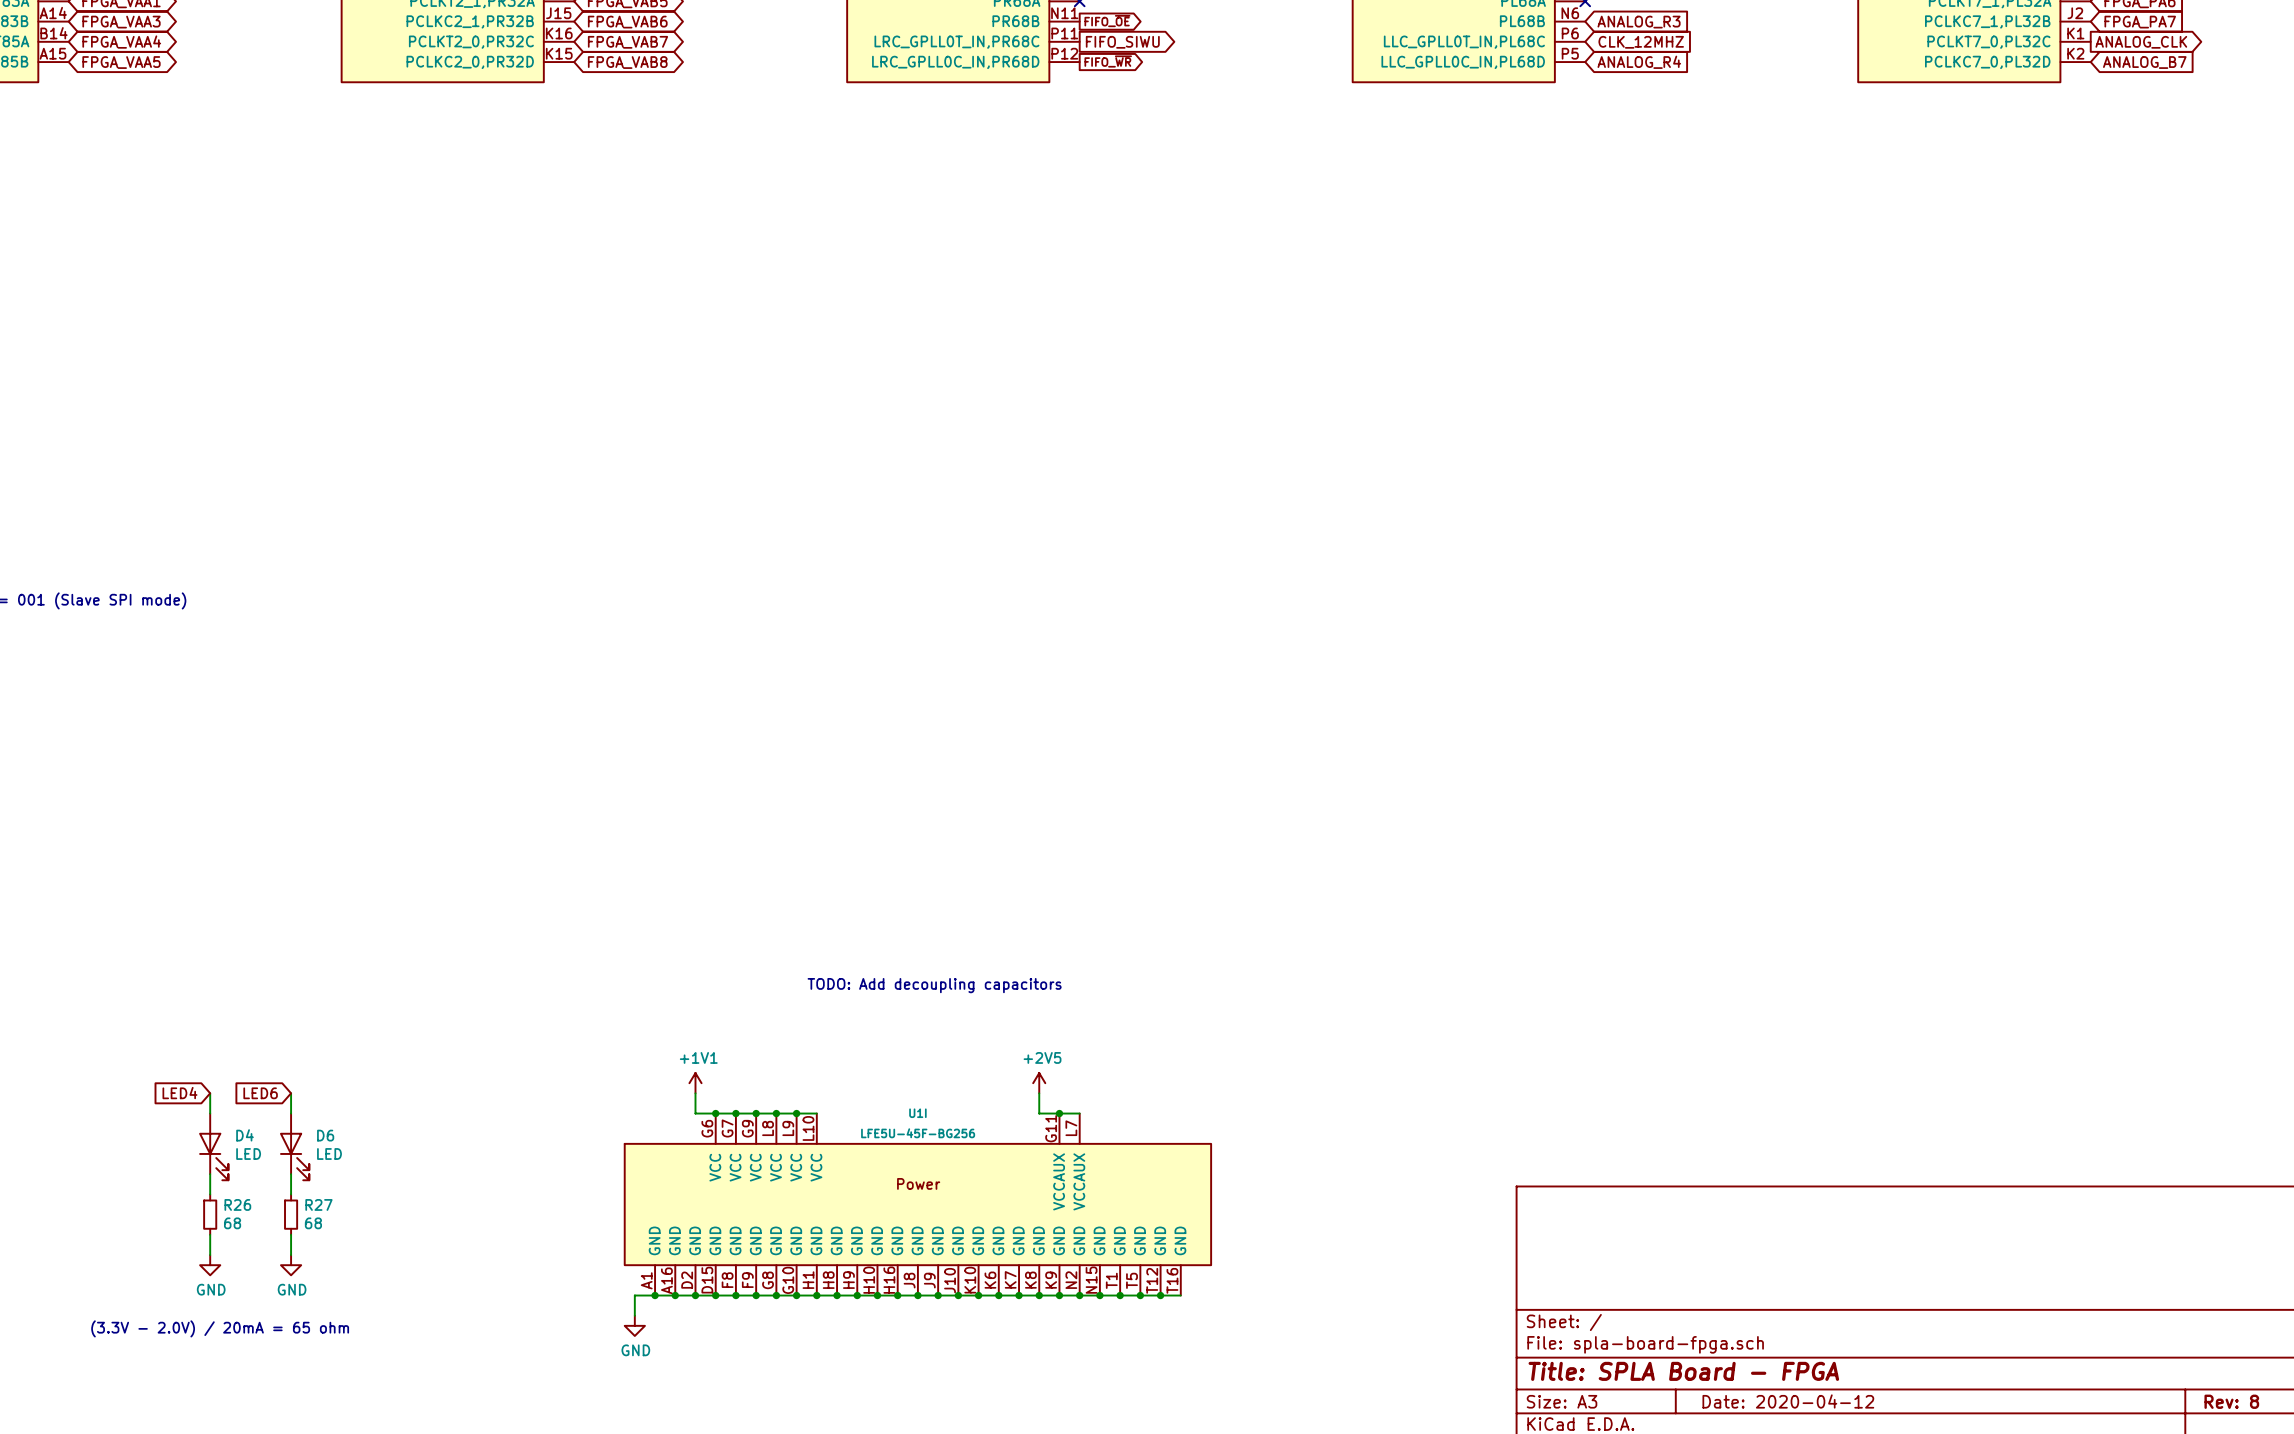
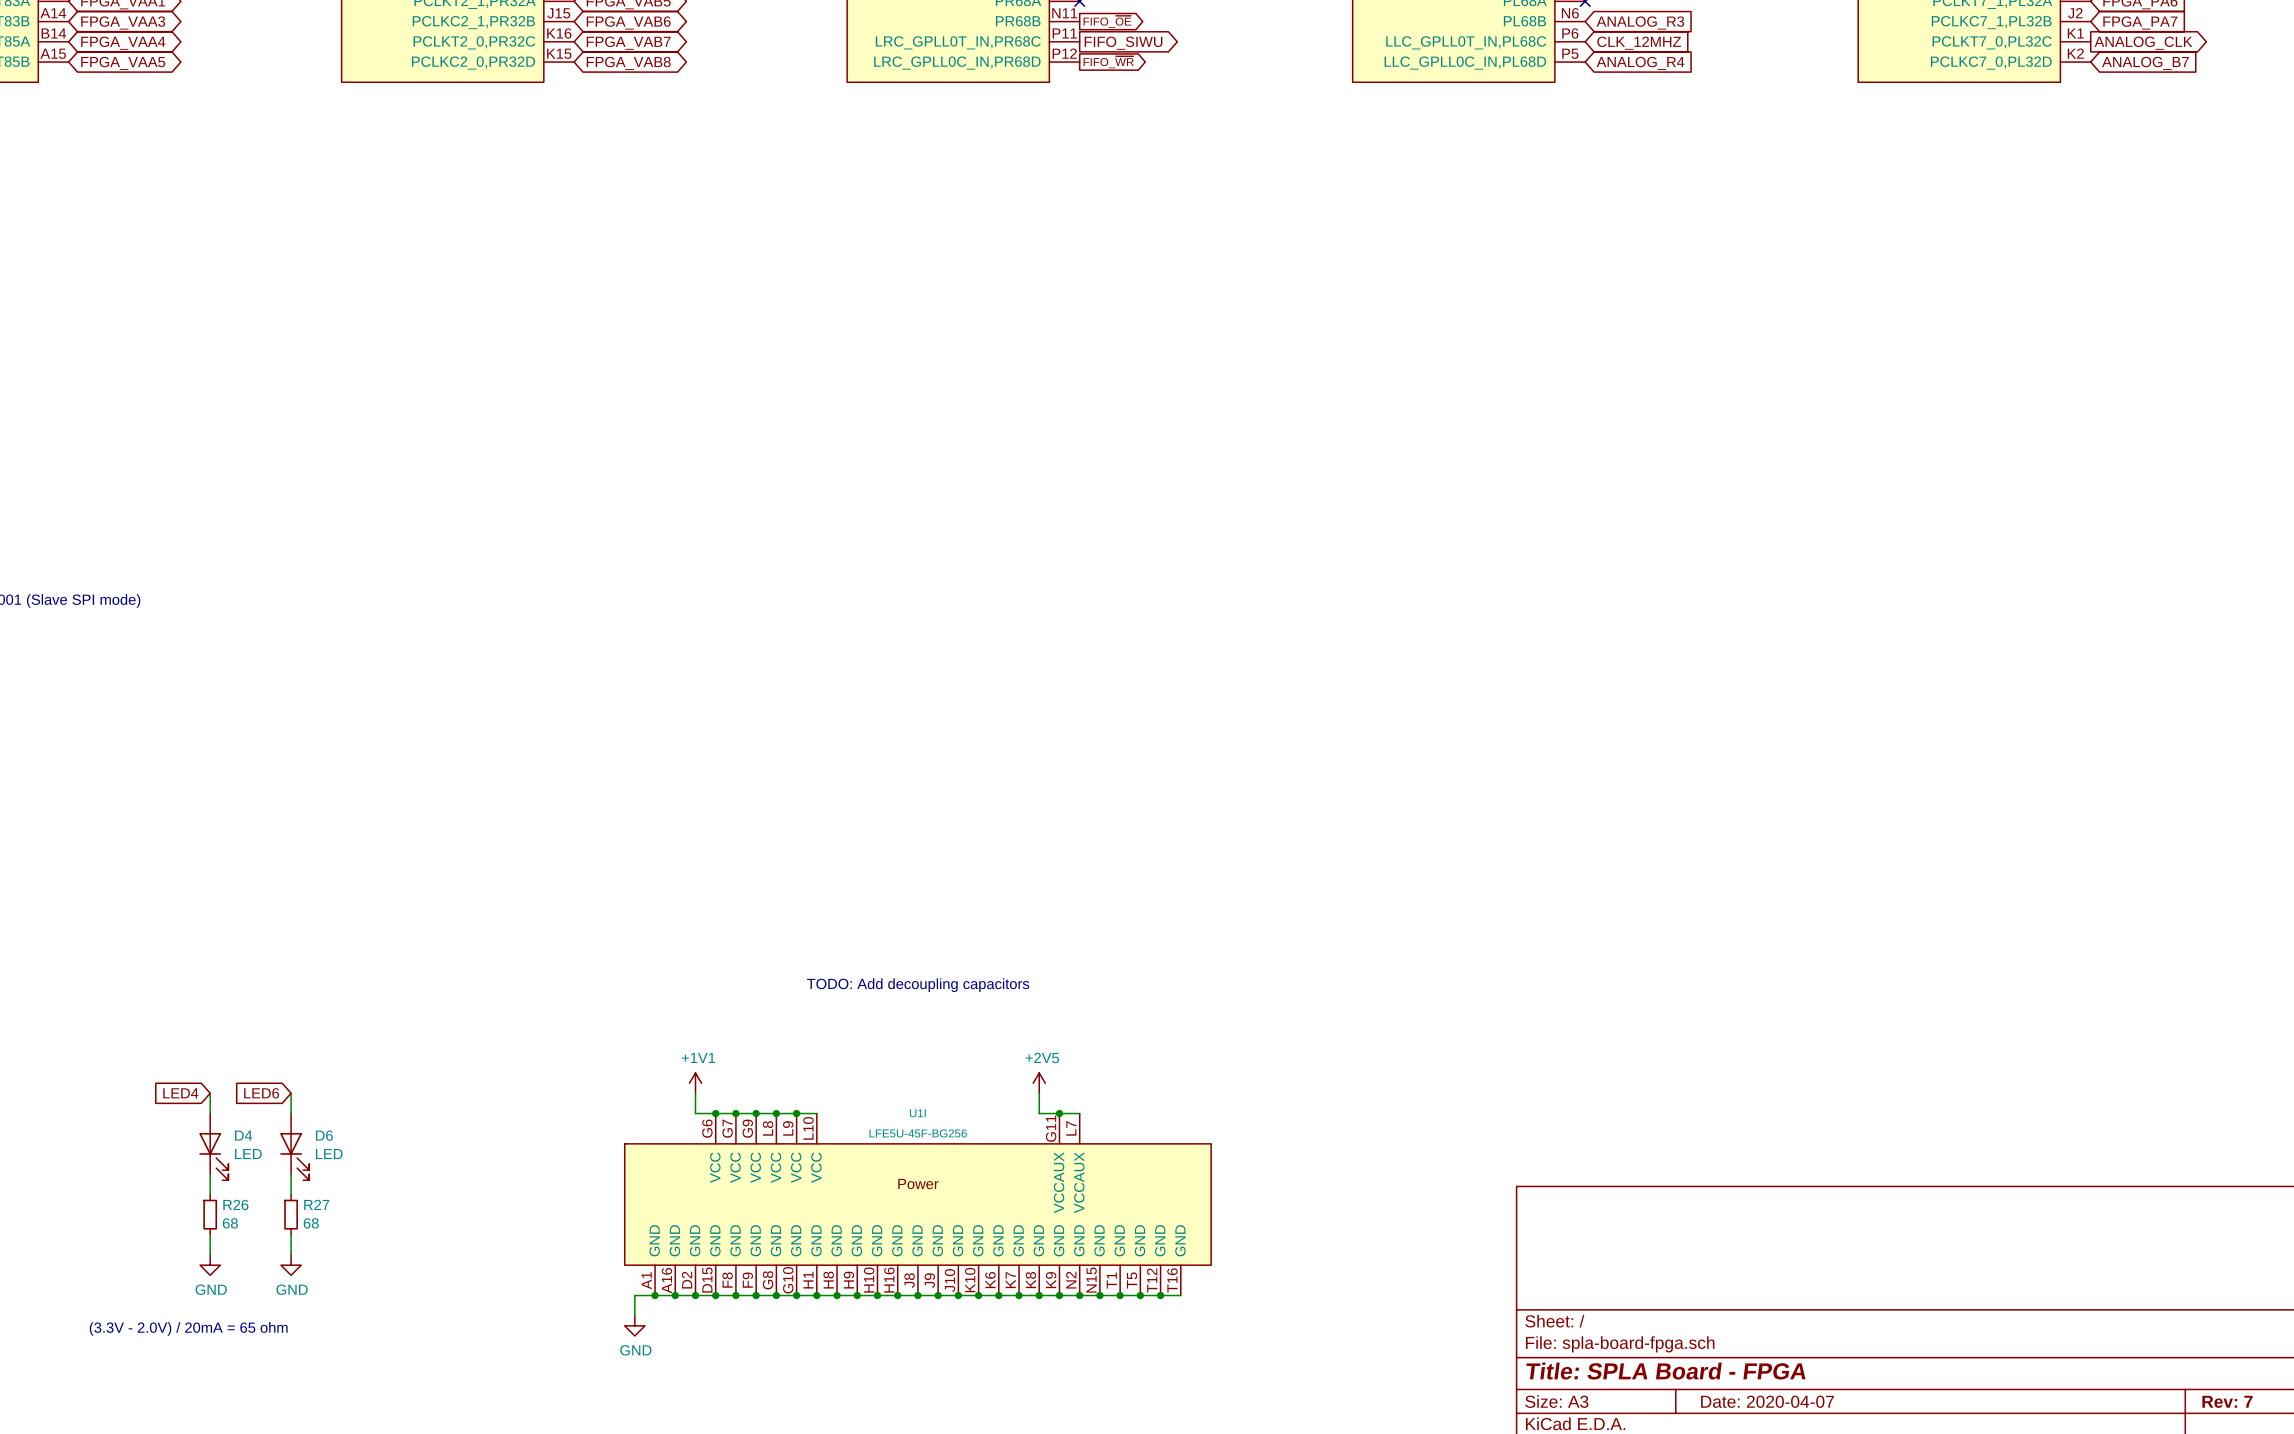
title block: Date: 2020-04-12 (1788, 1401) -> Date: 2020-04-07 (1767, 1401)
title block: Rev: 8 (2231, 1401) -> Rev: 7 (2227, 1401)

